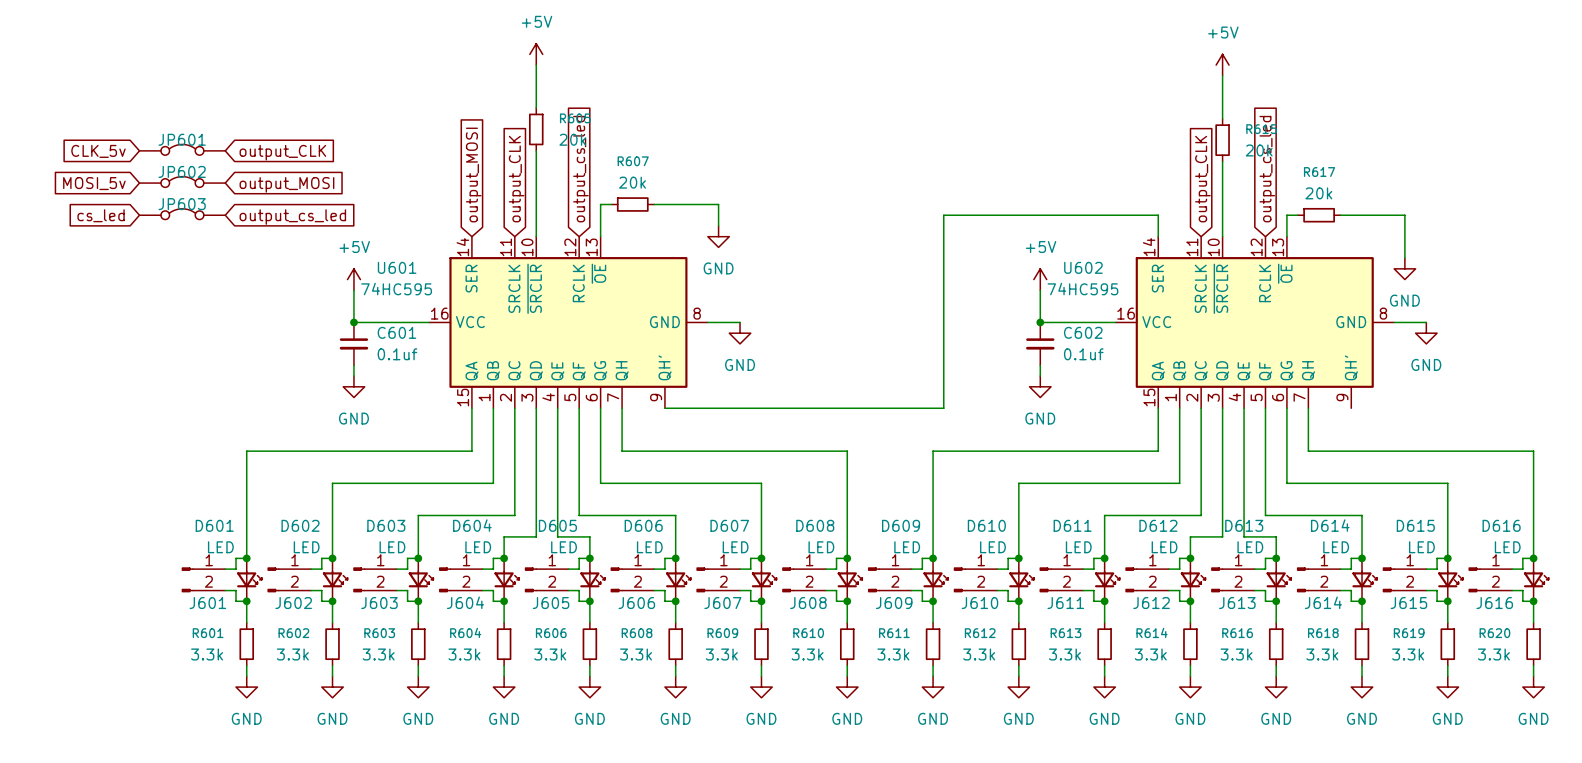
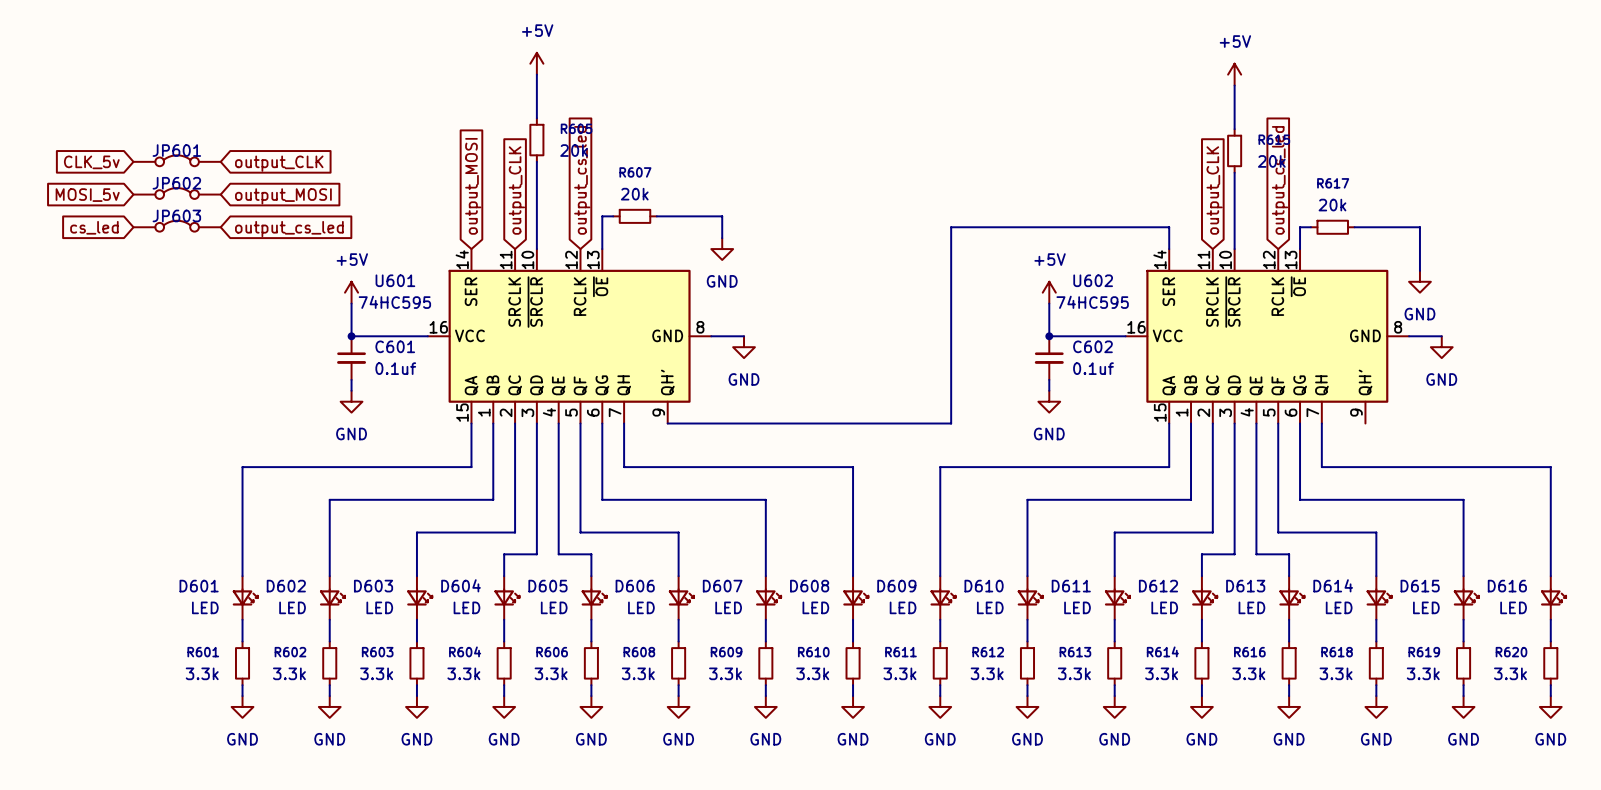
D601 name position: D601 (214, 525) -> D601 (199, 586)
D602 name position: D602 (300, 525) -> D602 (286, 586)
D603 name position: D603 (386, 525) -> D603 (373, 586)
D604 name position: D604 (472, 525) -> D604 (461, 585)
D605 name position: D605 (557, 525) -> D605 (547, 586)
D606 name position: D606 (643, 525) -> D606 (635, 586)
D607 name position: D607 (729, 525) -> D607 (722, 586)
D608 name position: D608 (815, 525) -> D608 (809, 586)
D609 name position: D609 (901, 525) -> D609 (896, 586)
D610 name position: D610 (986, 525) -> D610 (984, 586)
D611 name position: D611 (1072, 525) -> D611 (1071, 586)
D612 name position: D612 (1158, 525) -> D612 (1158, 586)
D613 name position: D613 (1244, 525) -> D613 (1245, 586)
D614 name position: D614 (1330, 525) -> D614 (1333, 585)
D615 name position: D615 (1415, 525) -> D615 (1420, 586)
D616 name position: D616 (1501, 525) -> D616 (1507, 586)
D601 value position: LED (220, 547) -> LED (205, 607)
D602 value position: LED (306, 547) -> LED (292, 607)
D603 value position: LED (392, 547) -> LED (379, 607)
D604 value position: LED (478, 547) -> LED (466, 607)
D605 value position: LED (564, 547) -> LED (554, 607)
D606 value position: LED (649, 547) -> LED (641, 607)
D607 value position: LED (735, 547) -> LED (728, 607)
D608 value position: LED (821, 547) -> LED (815, 607)
D609 value position: LED (907, 547) -> LED (903, 607)
D610 value position: LED (992, 547) -> LED (990, 607)
D611 value position: LED (1078, 547) -> LED (1077, 607)
D612 value position: LED (1164, 547) -> LED (1164, 607)
D613 value position: LED (1250, 547) -> LED (1251, 607)
D614 value position: LED (1336, 547) -> LED (1339, 607)
D615 value position: LED (1421, 547) -> LED (1426, 607)
D616 value position: LED (1507, 547) -> LED (1513, 607)
wire: (246, 558) (236, 558) (236, 569) (225, 569) -> none
junction: (246, 558) -> none
wire: (332, 558) (321, 558) (321, 569) (311, 569) -> none
junction: (332, 558) -> none
wire: (418, 558) (407, 558) (407, 569) (396, 569) -> none
junction: (418, 558) -> none
wire: (504, 558) (493, 558) (493, 569) (482, 569) -> none
junction: (504, 558) -> none
wire: (589, 558) (579, 558) (579, 569) (568, 569) -> none
junction: (589, 558) -> none
wire: (675, 558) (664, 558) (664, 569) (654, 569) -> none
junction: (675, 558) -> none
wire: (761, 558) (750, 558) (750, 569) (740, 569) -> none
junction: (761, 558) -> none
wire: (847, 558) (836, 558) (836, 569) (825, 569) -> none
junction: (847, 558) -> none
wire: (933, 558) (922, 558) (922, 569) (911, 569) -> none
junction: (933, 558) -> none
wire: (1018, 558) (1008, 558) (1008, 569) (997, 569) -> none
junction: (1018, 558) -> none
wire: (1104, 558) (1093, 558) (1093, 569) (1083, 569) -> none
junction: (1104, 558) -> none
wire: (1190, 558) (1179, 558) (1179, 569) (1168, 569) -> none
junction: (1190, 558) -> none
wire: (1276, 558) (1265, 558) (1265, 569) (1254, 569) -> none
junction: (1276, 558) -> none
wire: (1362, 558) (1351, 558) (1351, 569) (1340, 569) -> none
junction: (1362, 558) -> none
wire: (1447, 558) (1437, 558) (1437, 569) (1426, 569) -> none
junction: (1447, 558) -> none
wire: (1533, 558) (1522, 558) (1522, 569) (1512, 569) -> none
junction: (1533, 558) -> none
J601: (203, 579) -> none
J602: (289, 579) -> none
J603: (375, 579) -> none
J604: (460, 579) -> none
J605: (546, 579) -> none
J606: (632, 579) -> none
J607: (718, 579) -> none
J608: (804, 579) -> none
J609: (889, 579) -> none
J610: (975, 579) -> none
J611: (1061, 579) -> none
J612: (1147, 579) -> none
J613: (1232, 579) -> none
J614: (1318, 579) -> none
J615: (1404, 579) -> none
J616: (1490, 579) -> none
wire: (225, 590) (236, 590) (236, 601) (246, 601) -> none
wire: (311, 590) (321, 590) (321, 601) (332, 601) -> none
wire: (396, 590) (407, 590) (407, 601) (418, 601) -> none
wire: (482, 590) (493, 590) (493, 601) (504, 601) -> none
wire: (568, 590) (579, 590) (579, 601) (589, 601) -> none
wire: (654, 590) (664, 590) (664, 601) (675, 601) -> none
wire: (740, 590) (750, 590) (750, 601) (761, 601) -> none
wire: (825, 590) (836, 590) (836, 601) (847, 601) -> none
wire: (911, 590) (922, 590) (922, 601) (933, 601) -> none
wire: (997, 590) (1008, 590) (1008, 601) (1018, 601) -> none
wire: (1083, 590) (1093, 590) (1093, 601) (1104, 601) -> none
wire: (1168, 590) (1179, 590) (1179, 601) (1190, 601) -> none
wire: (1254, 590) (1265, 590) (1265, 601) (1276, 601) -> none
wire: (1340, 590) (1351, 590) (1351, 601) (1362, 601) -> none
wire: (1426, 590) (1437, 590) (1437, 601) (1447, 601) -> none
wire: (1512, 590) (1522, 590) (1522, 601) (1533, 601) -> none
junction: (246, 601) -> none
junction: (332, 601) -> none
junction: (418, 601) -> none
junction: (504, 601) -> none
junction: (589, 601) -> none
junction: (675, 601) -> none
junction: (761, 601) -> none
junction: (847, 601) -> none
junction: (933, 601) -> none
junction: (1018, 601) -> none
junction: (1104, 601) -> none
junction: (1190, 601) -> none
junction: (1276, 601) -> none
junction: (1362, 601) -> none
junction: (1447, 601) -> none
junction: (1533, 601) -> none

